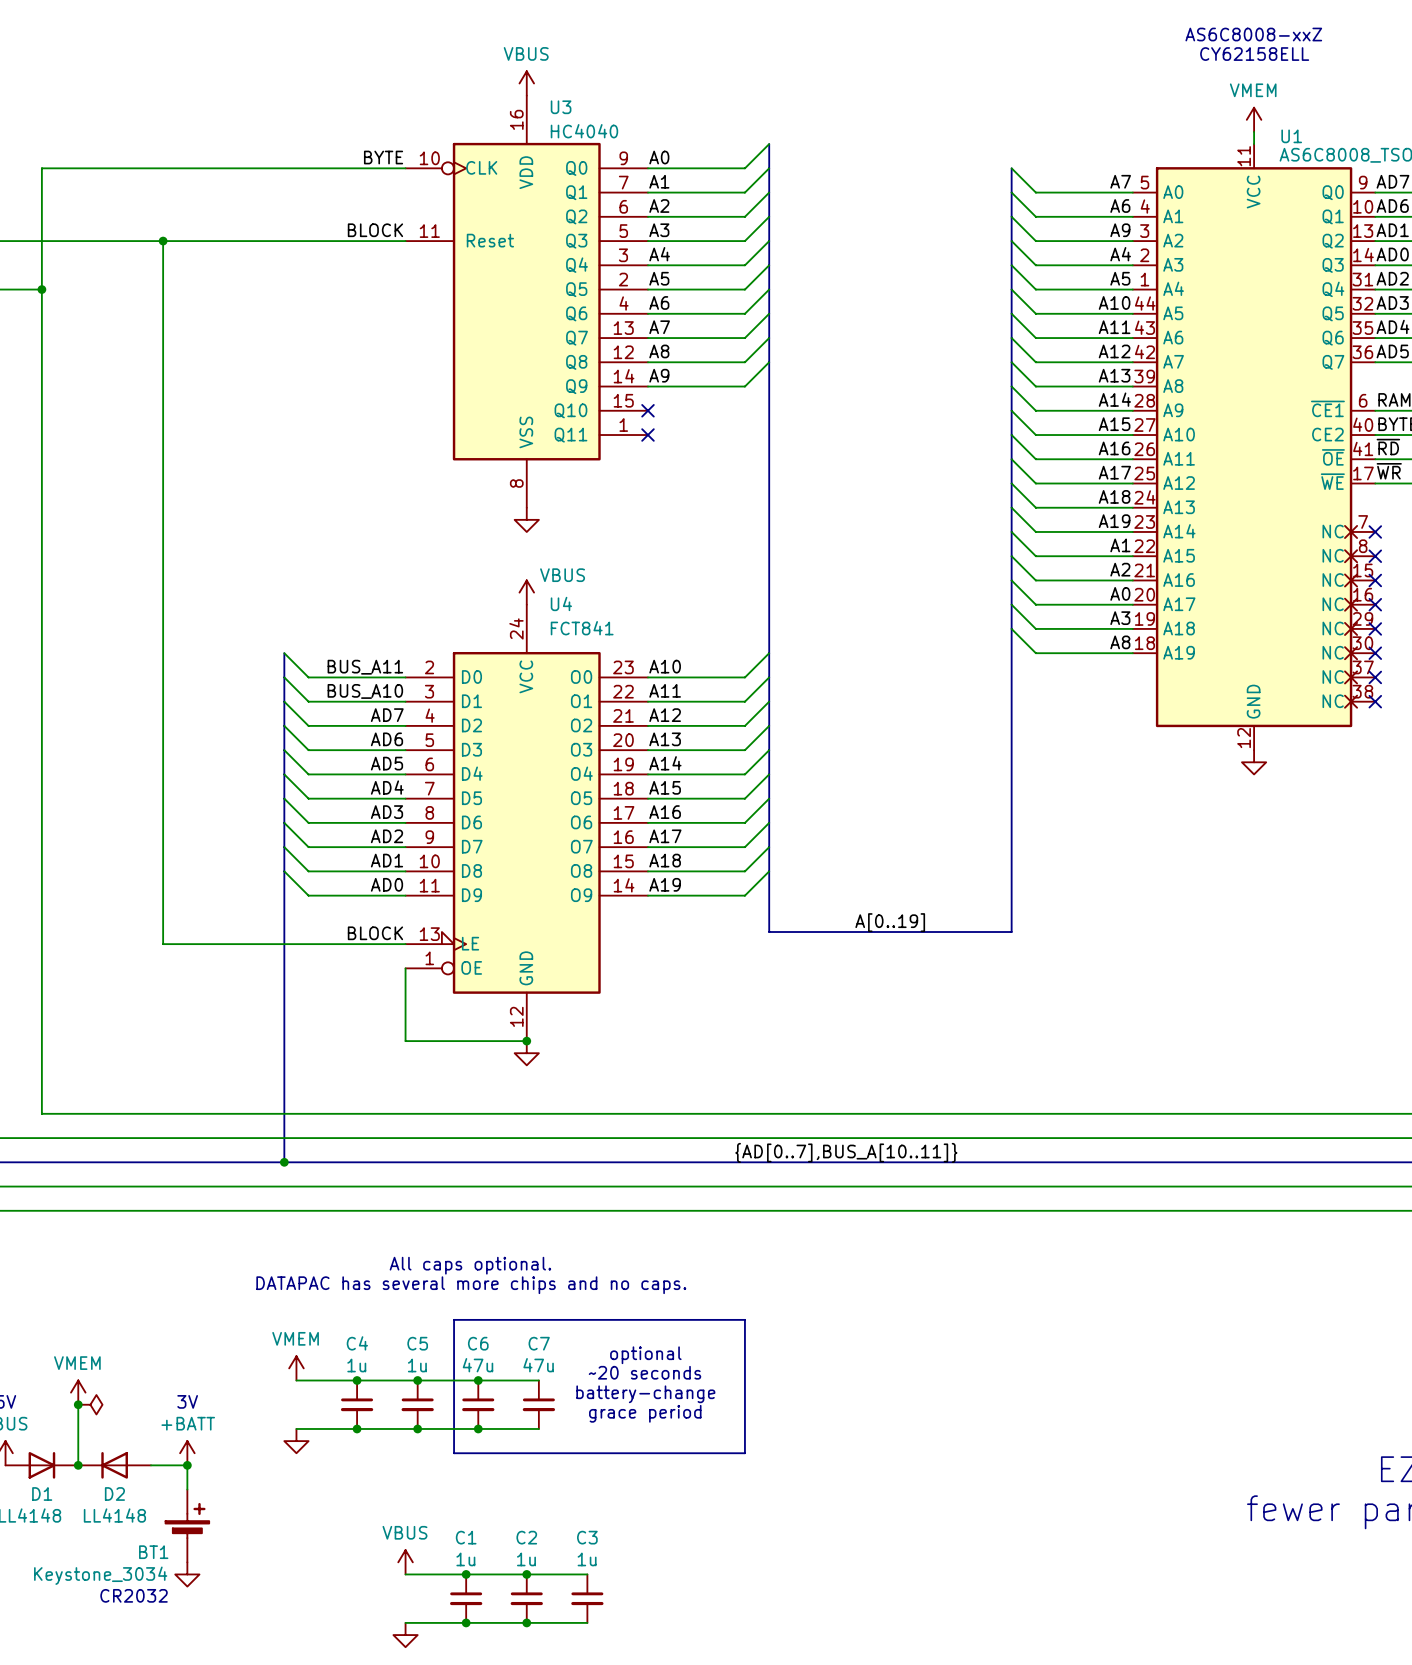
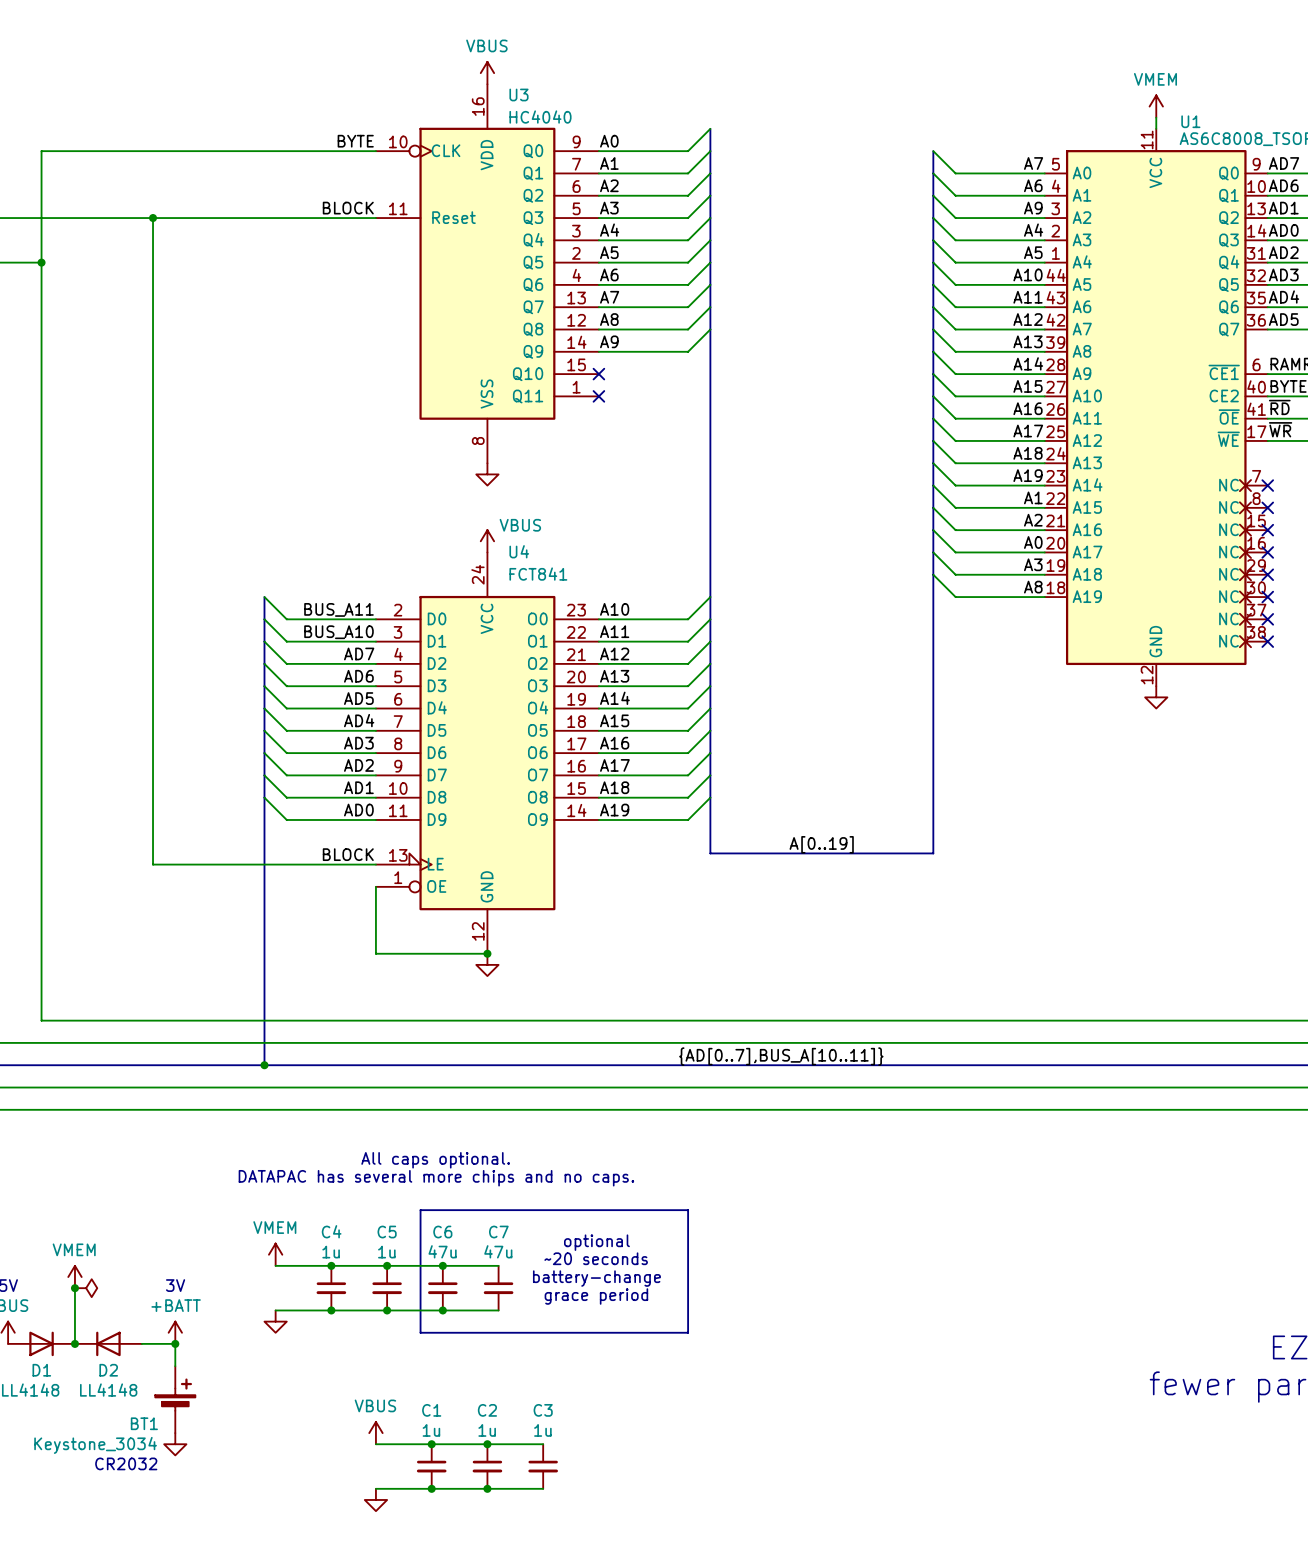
text: AS6C8008-xxZ (1253, 34) -> none
text: CY62158ELL (1254, 54) -> none

